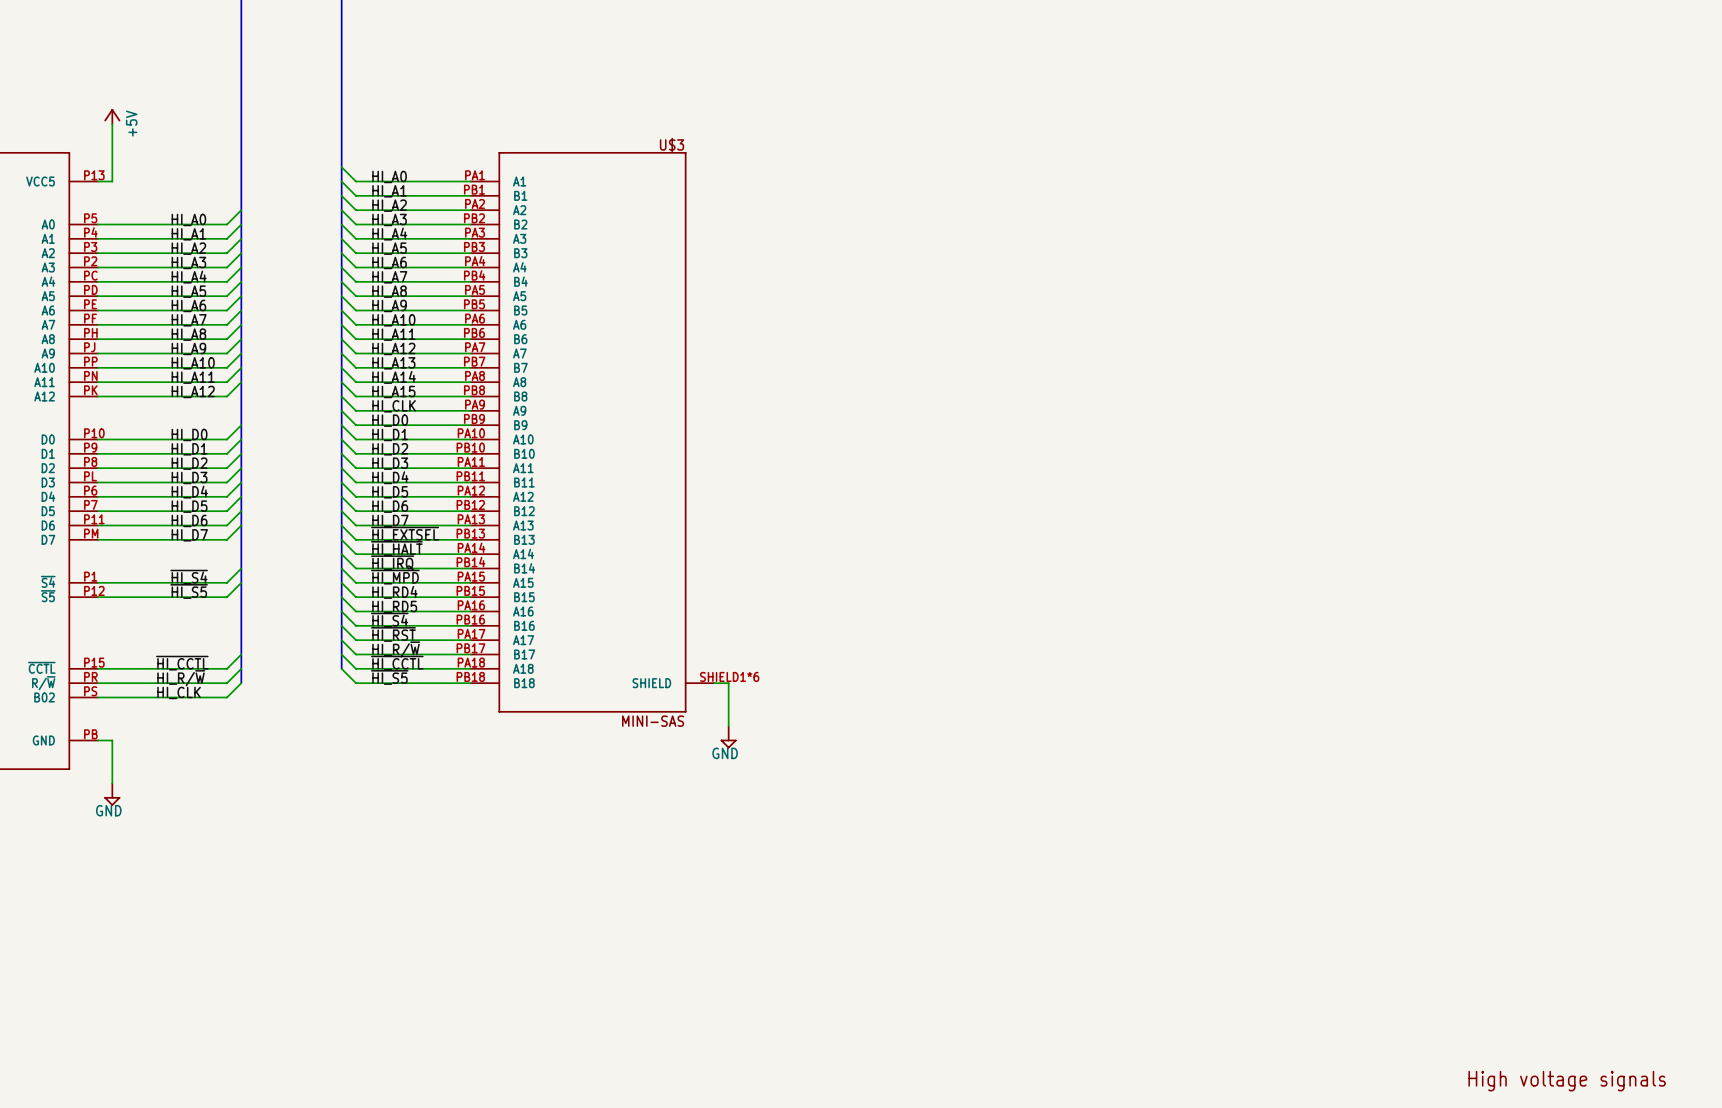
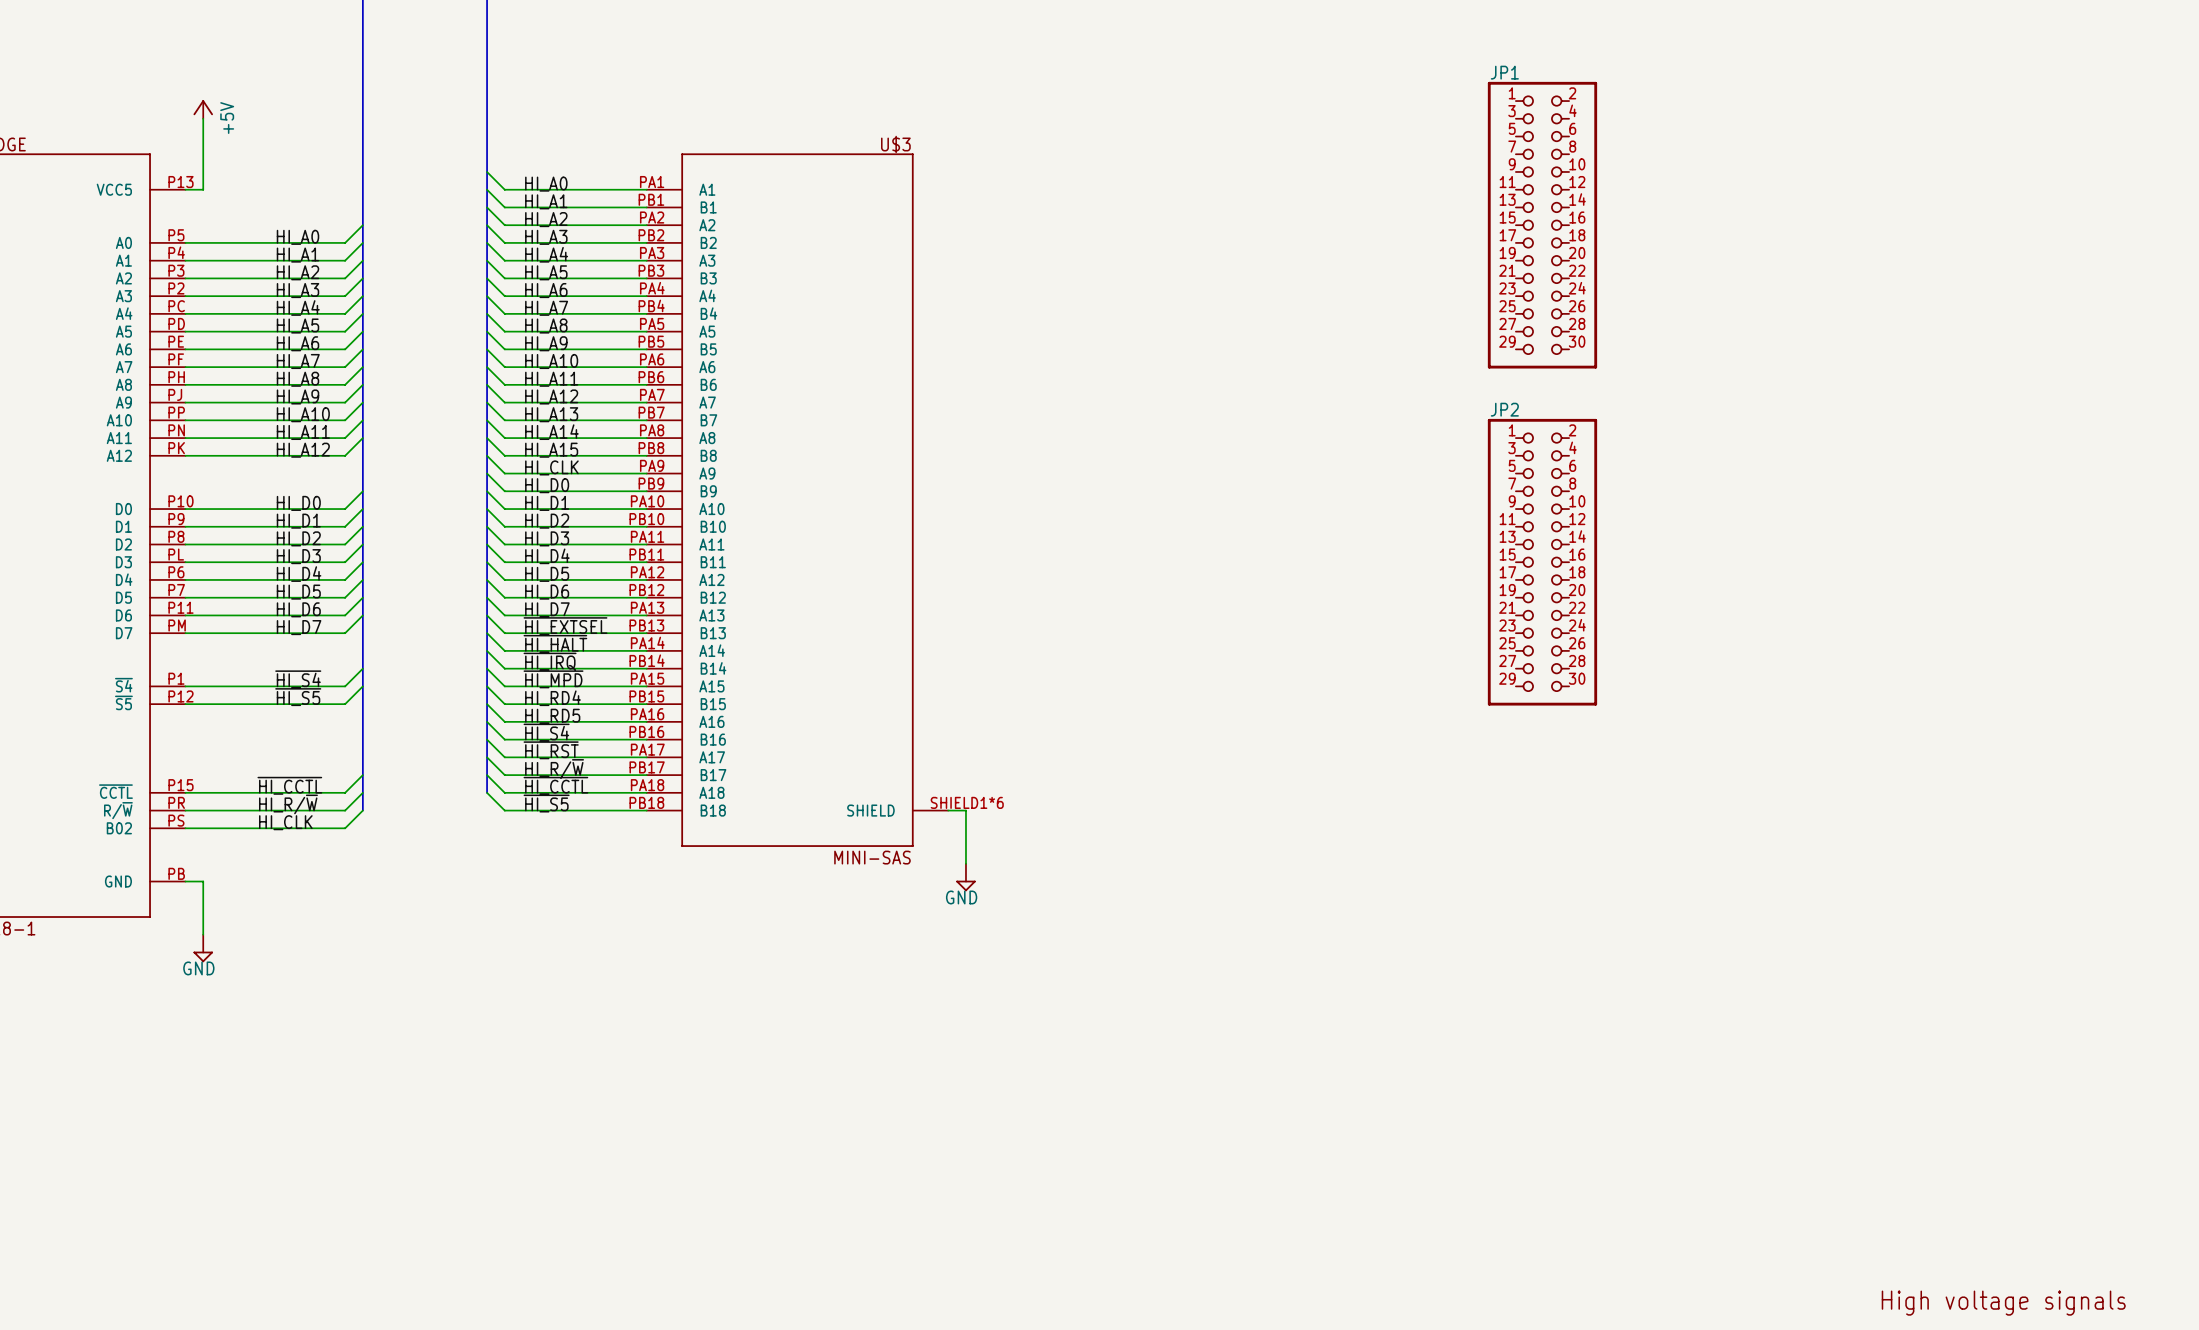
JP1: none -> (1542, 225)
JP2: none -> (1542, 562)

